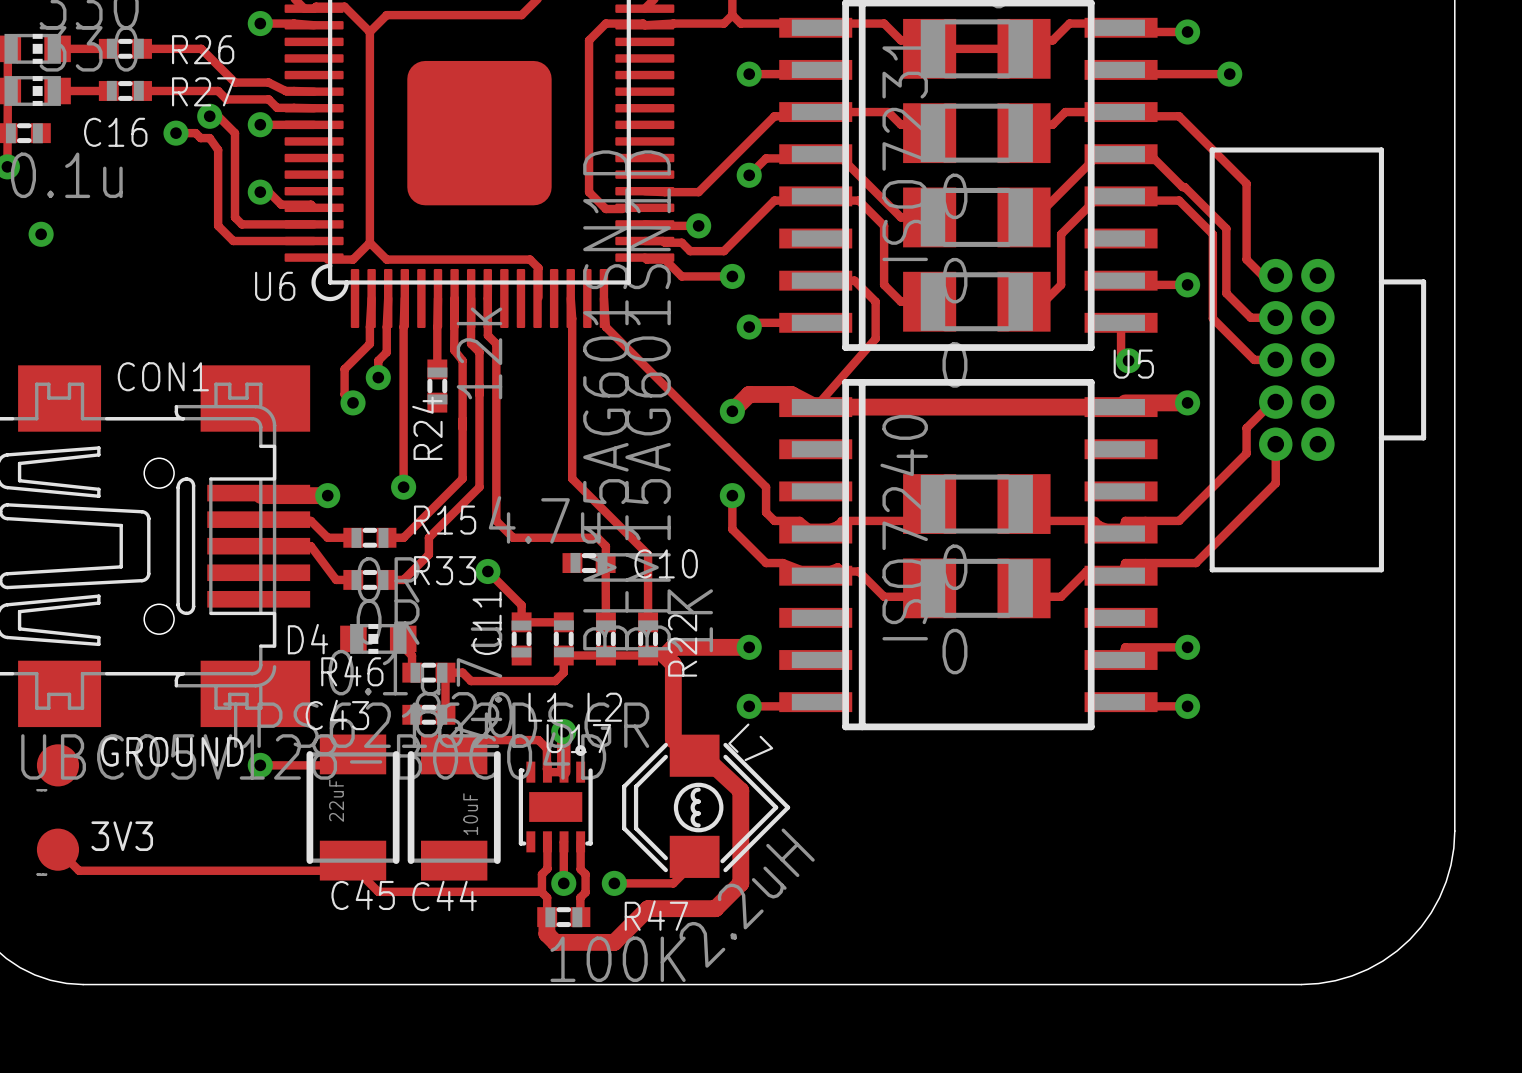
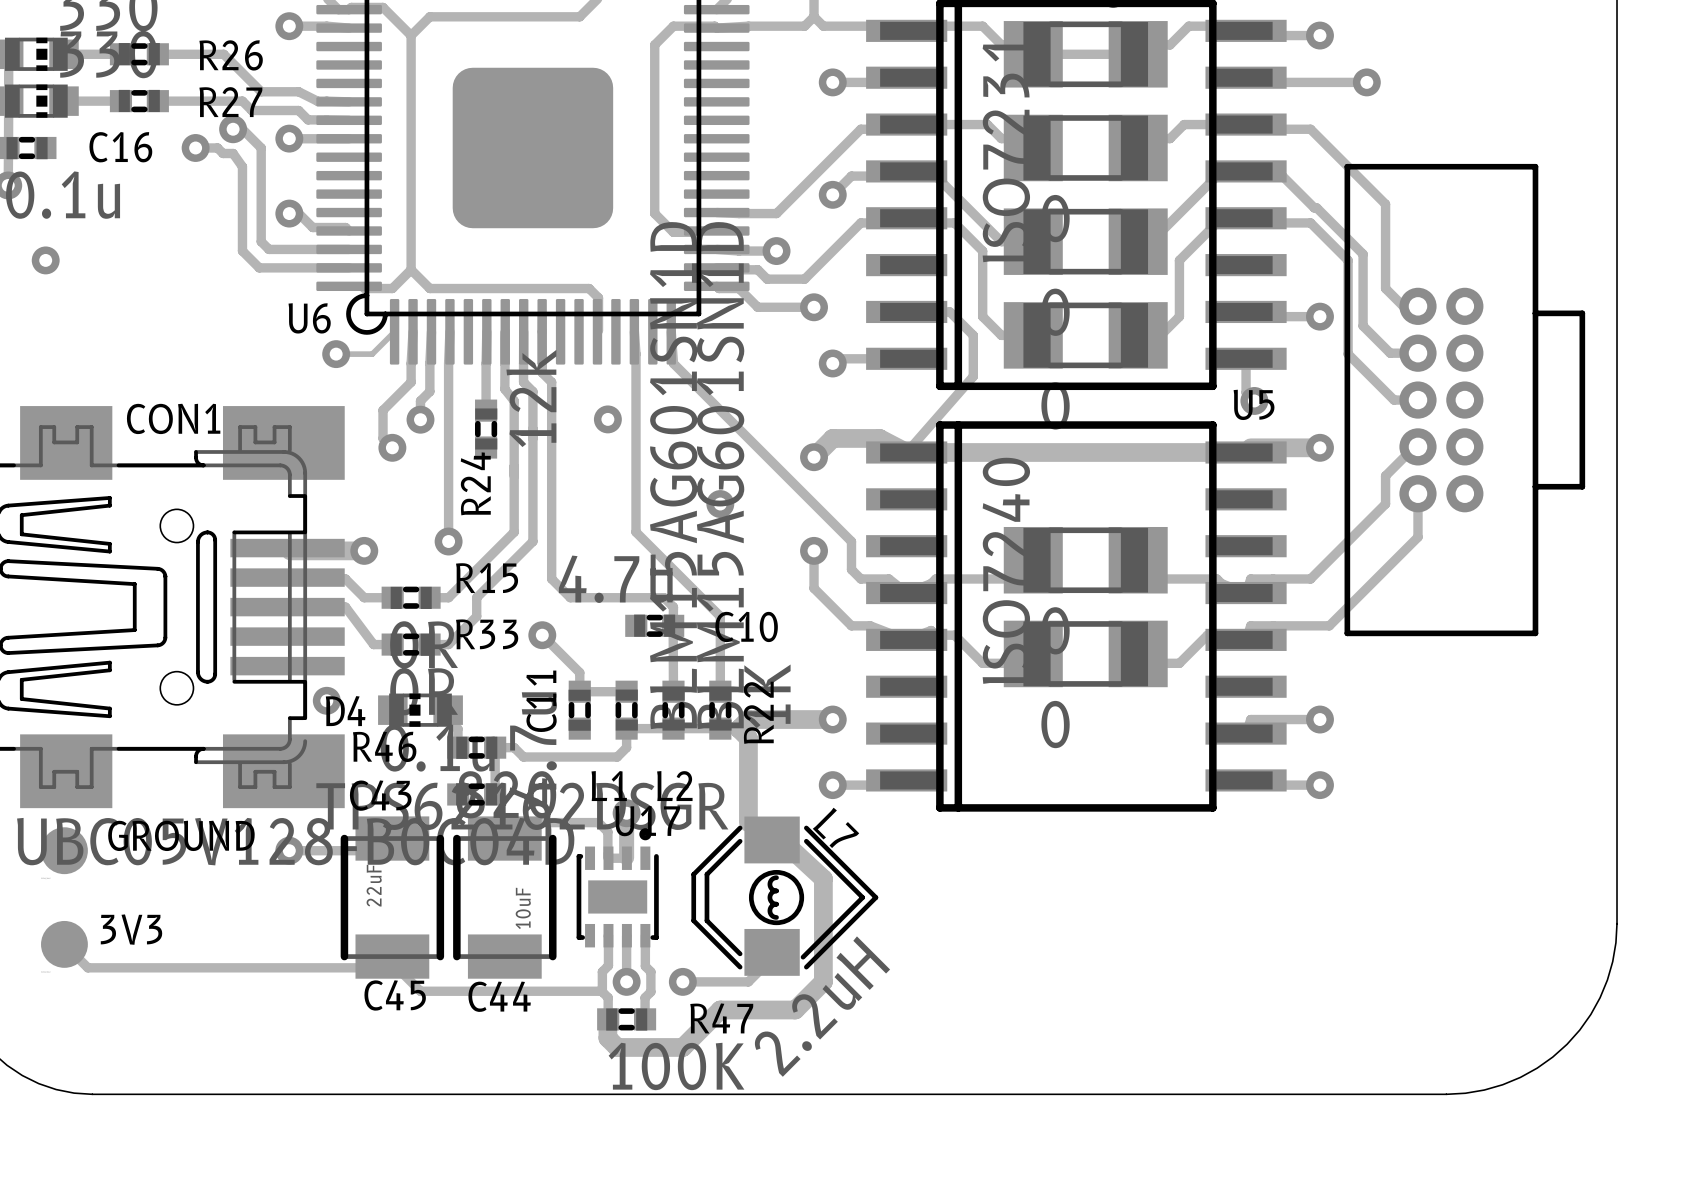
track: none -> (394, 331) (372, 354) (336, 354)
via: none -> (336, 354)
via: none -> (607, 419)
via: none -> (720, 504)
via: none -> (326, 700)

